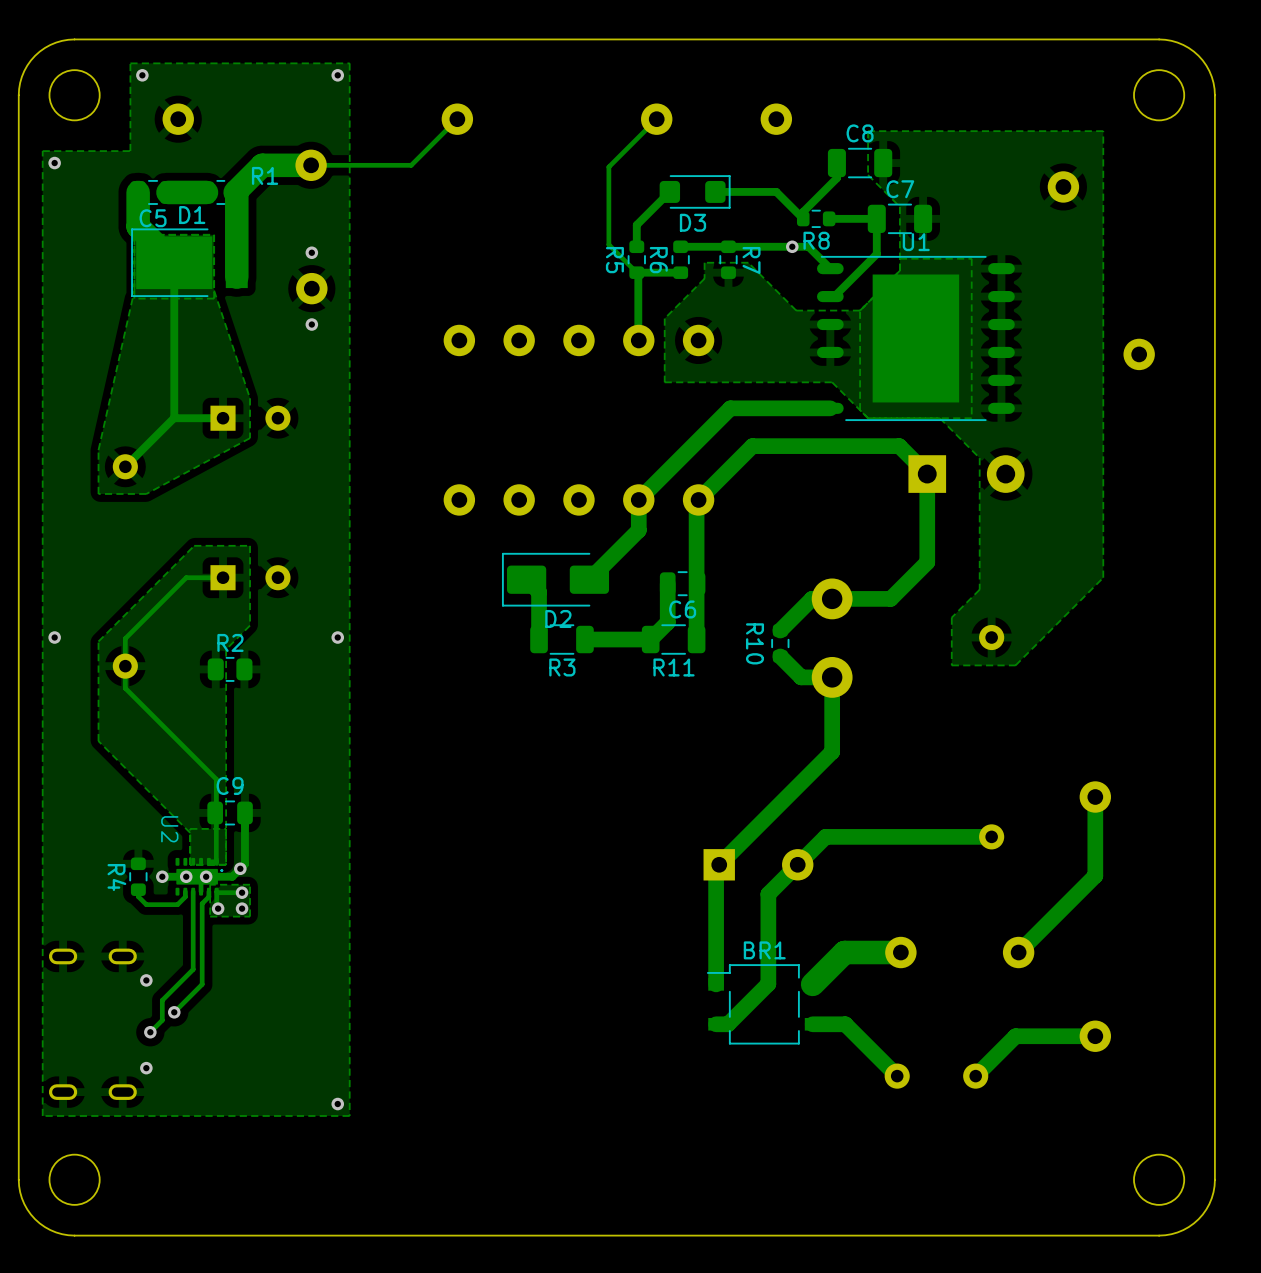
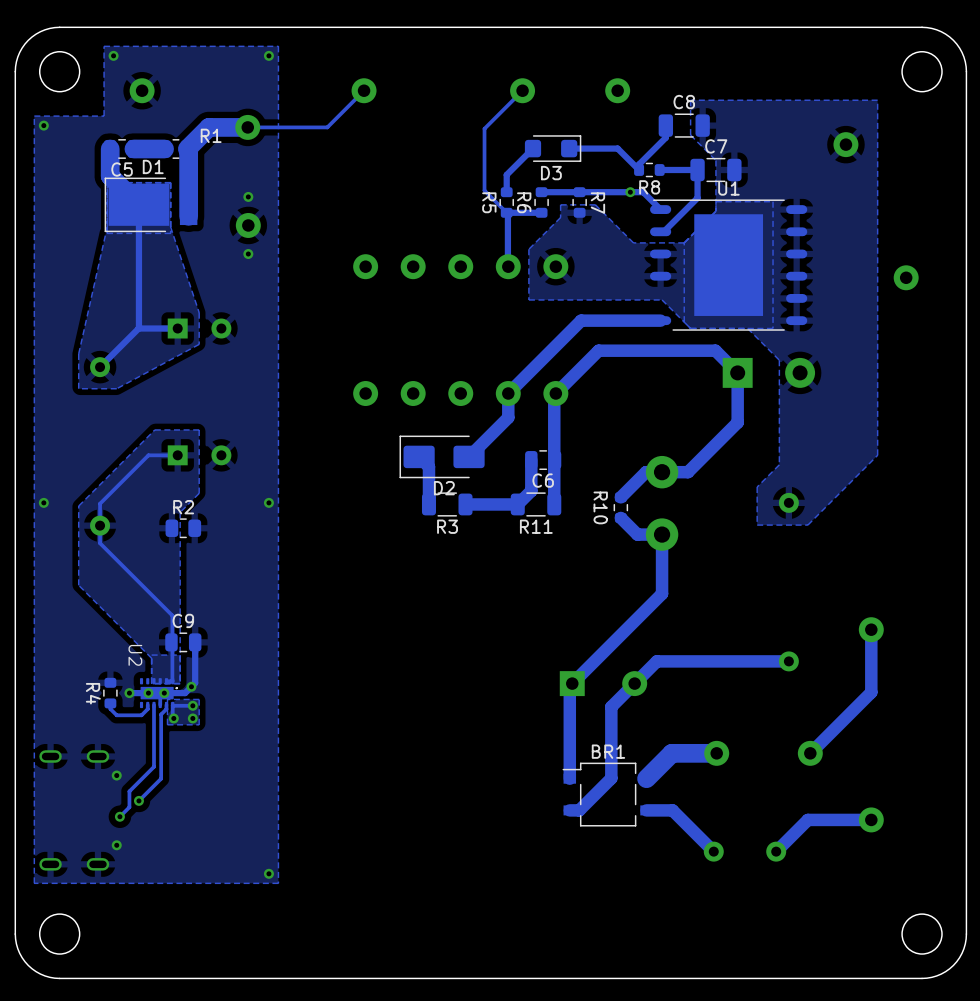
track: (927, 536) (927, 562) (890, 598) (864, 598) -> (737, 422) (688, 472)

